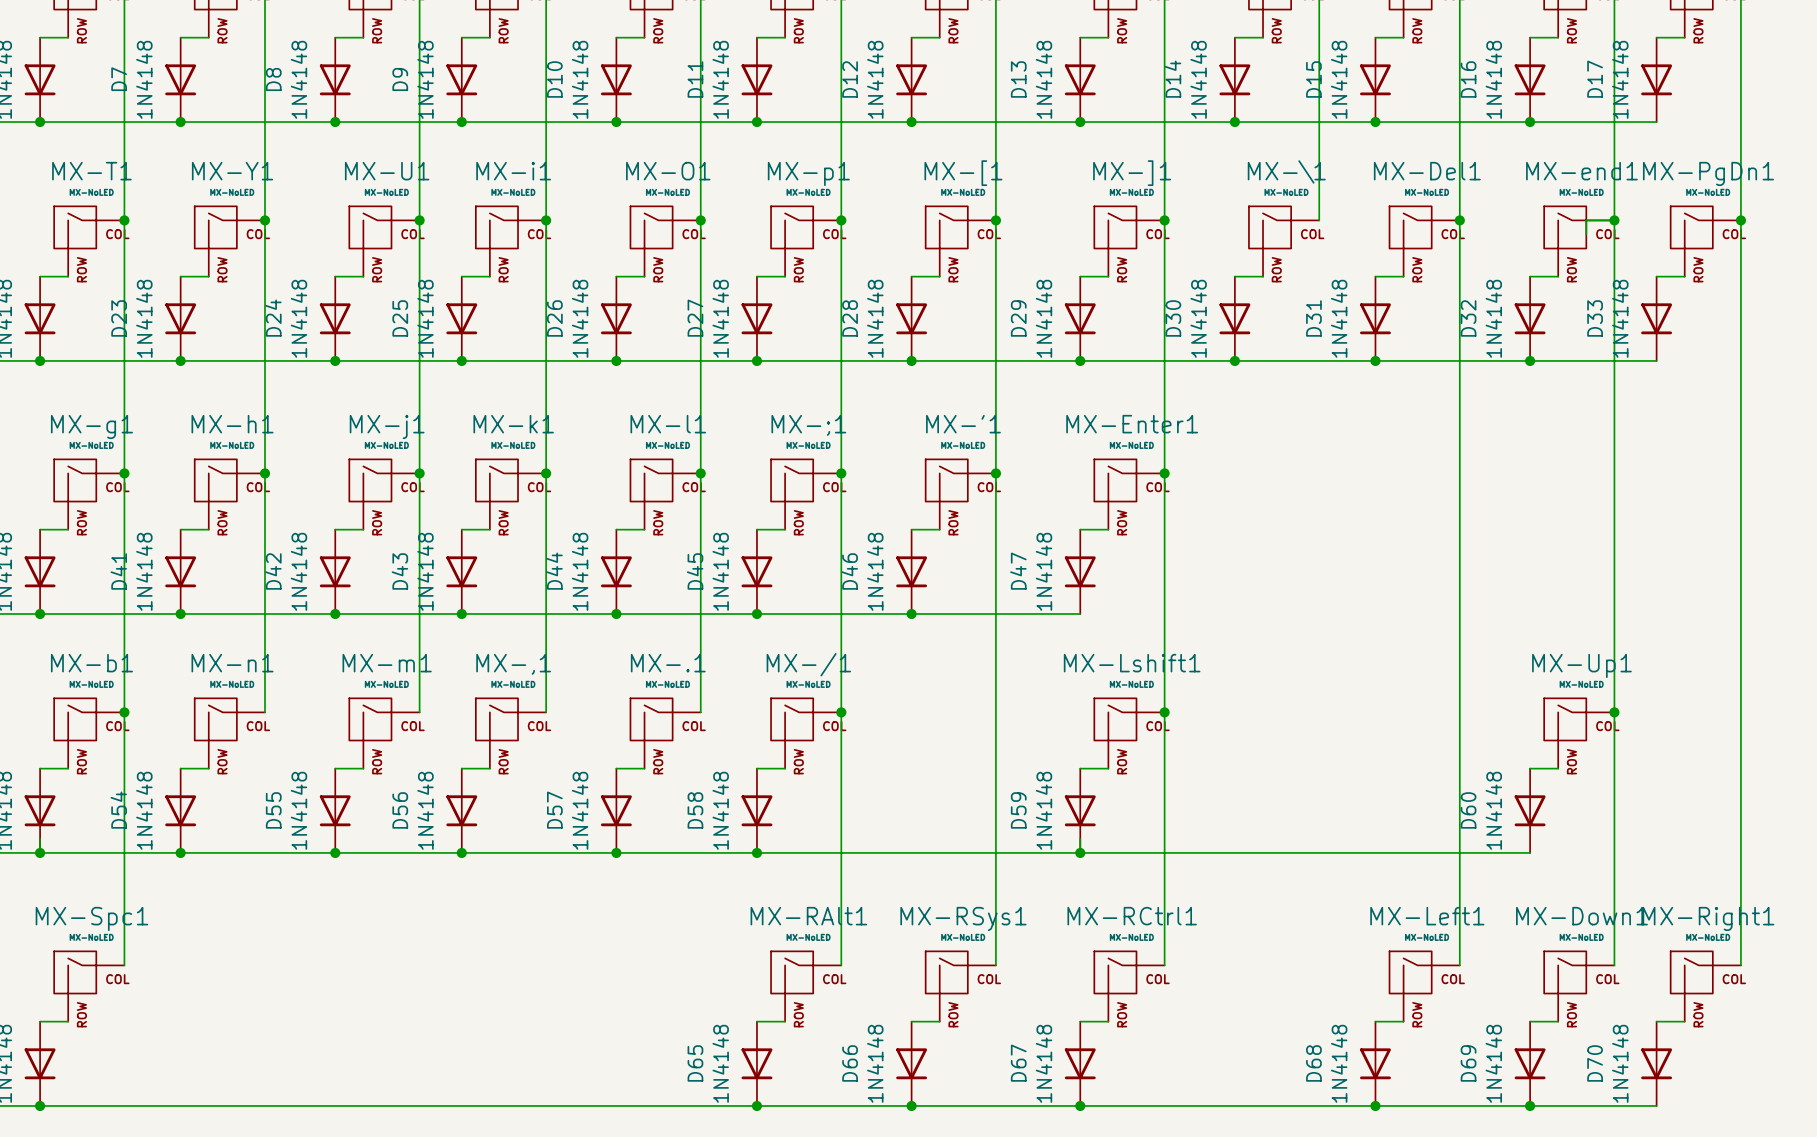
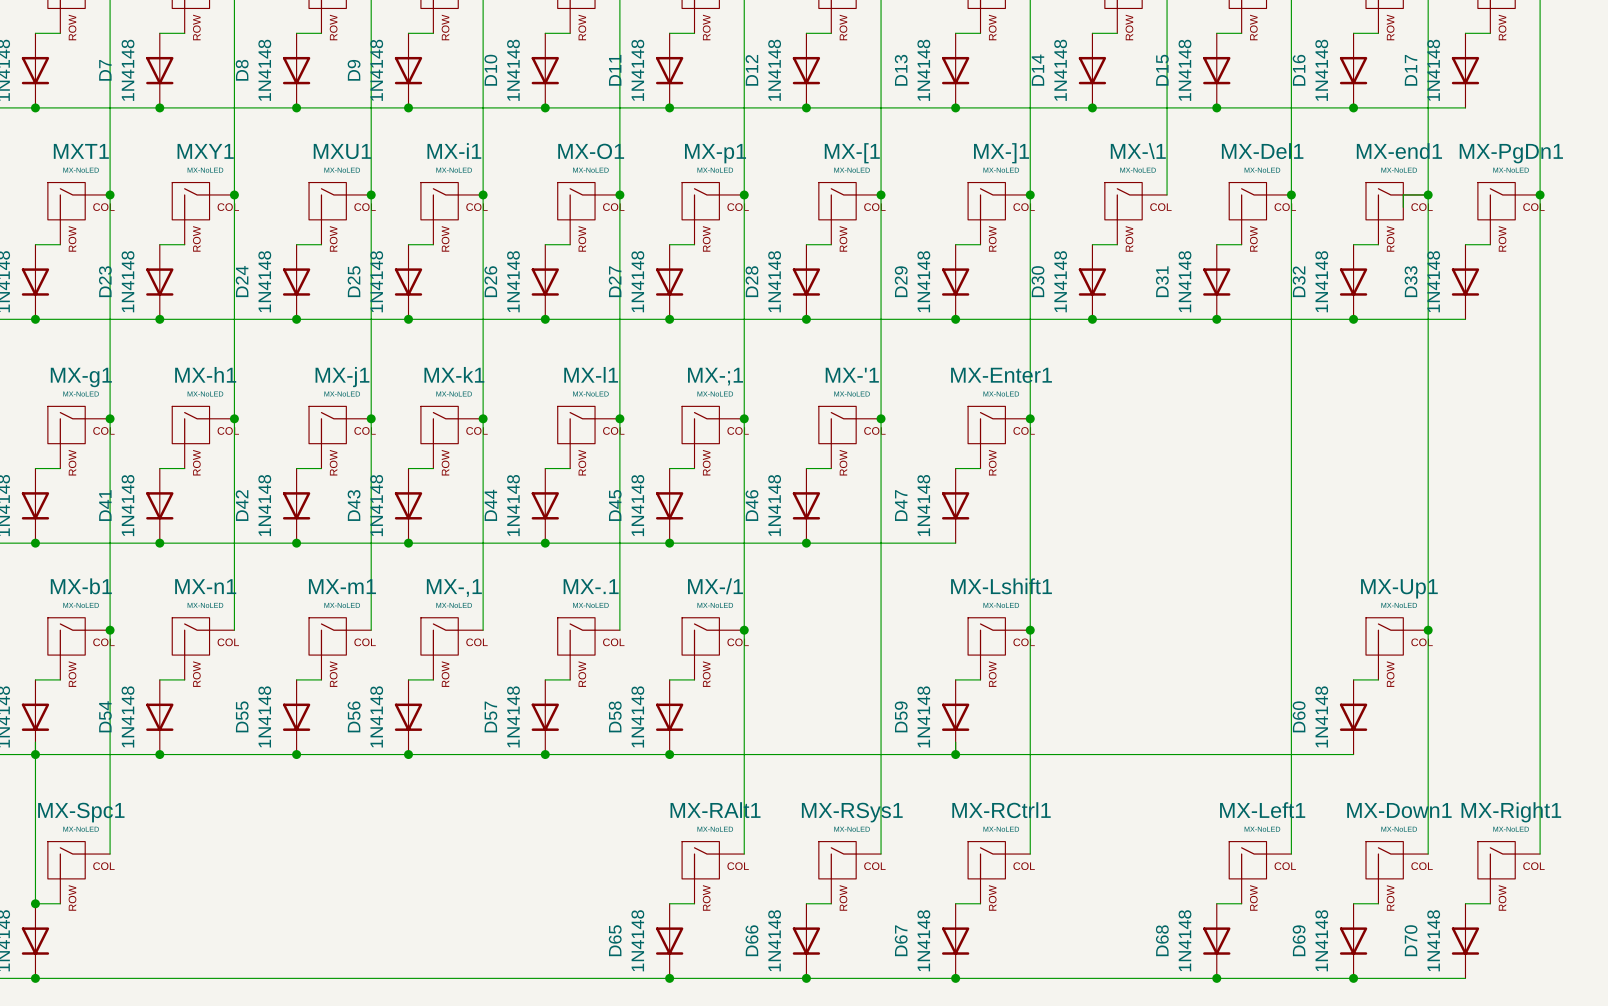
MX-T1 name: MX-T1 (91, 171) -> MXT1 (81, 151)
MX-Y1 name: MX-Y1 (232, 171) -> MXY1 (205, 151)
MX-U1 name: MX-U1 (387, 171) -> MXU1 (342, 151)
wire: none -> (35, 754) (35, 903)
junction: none -> (35, 903)

